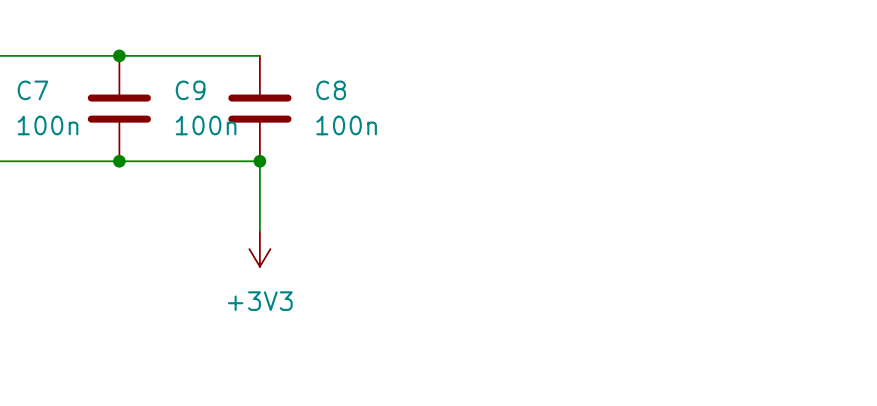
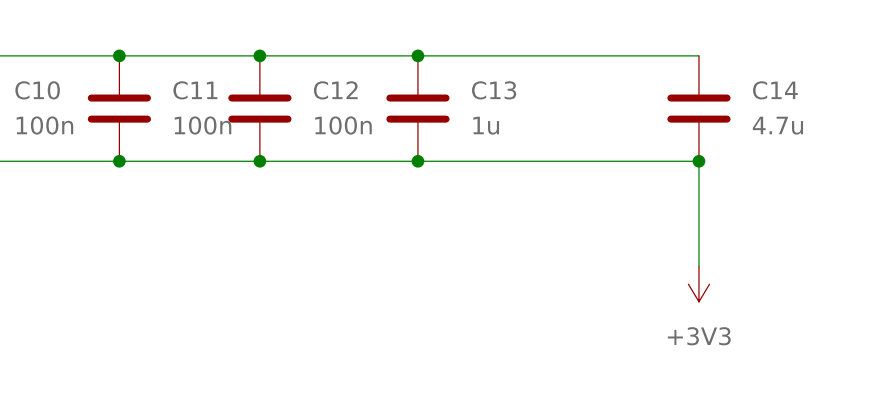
wire: none -> (259, 55) (698, 55)
junction: none -> (259, 55)
junction: none -> (417, 55)
C7 name: C7 (32, 90) -> C10 (37, 90)
C9 name: C9 (190, 90) -> C11 (195, 90)
C8 name: C8 (331, 90) -> C12 (335, 90)
C13: none -> 1u (417, 108)
C14: none -> 4.7u (698, 108)
wire: (259, 161) (259, 231) -> (259, 161) (698, 161) (698, 266)
junction: none -> (417, 161)
junction: none -> (698, 161)
power symbol: +3V3 (259, 249) -> none
power symbol: none -> +3V3 (698, 284)

